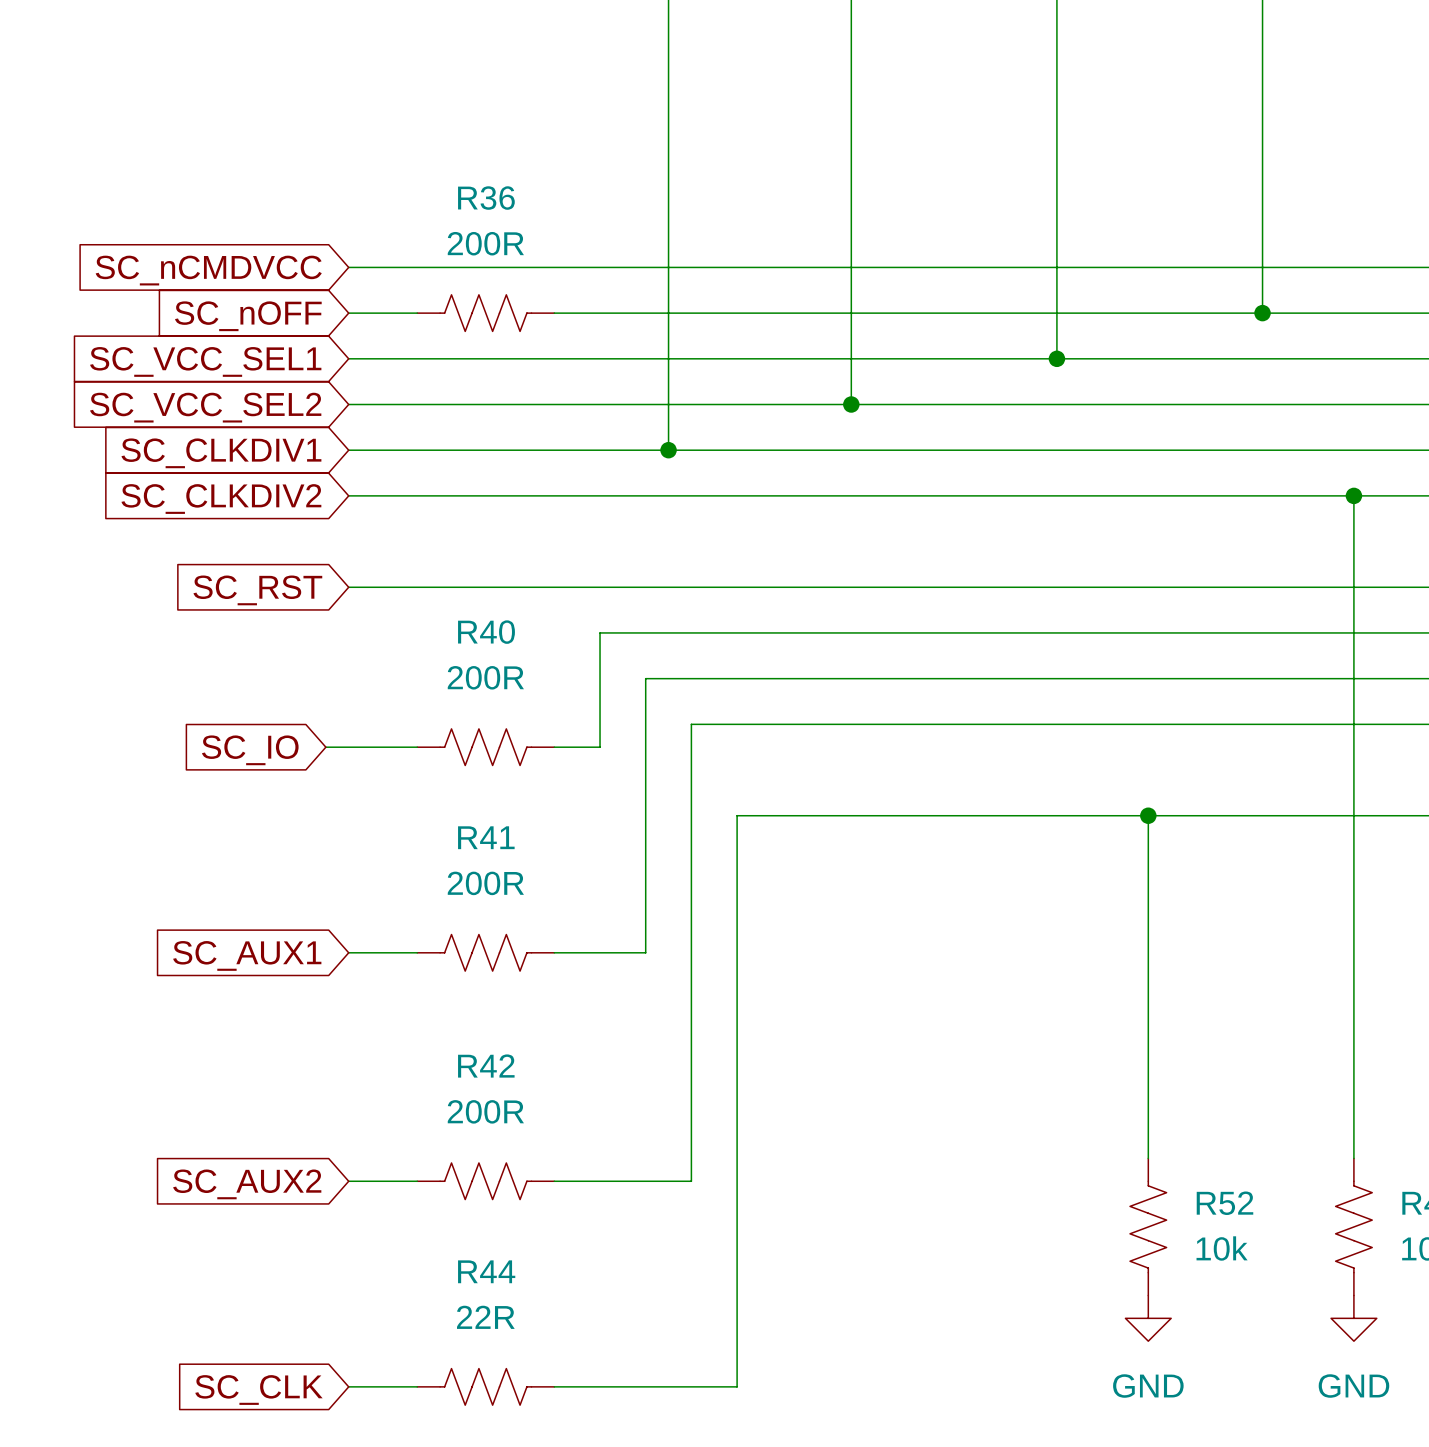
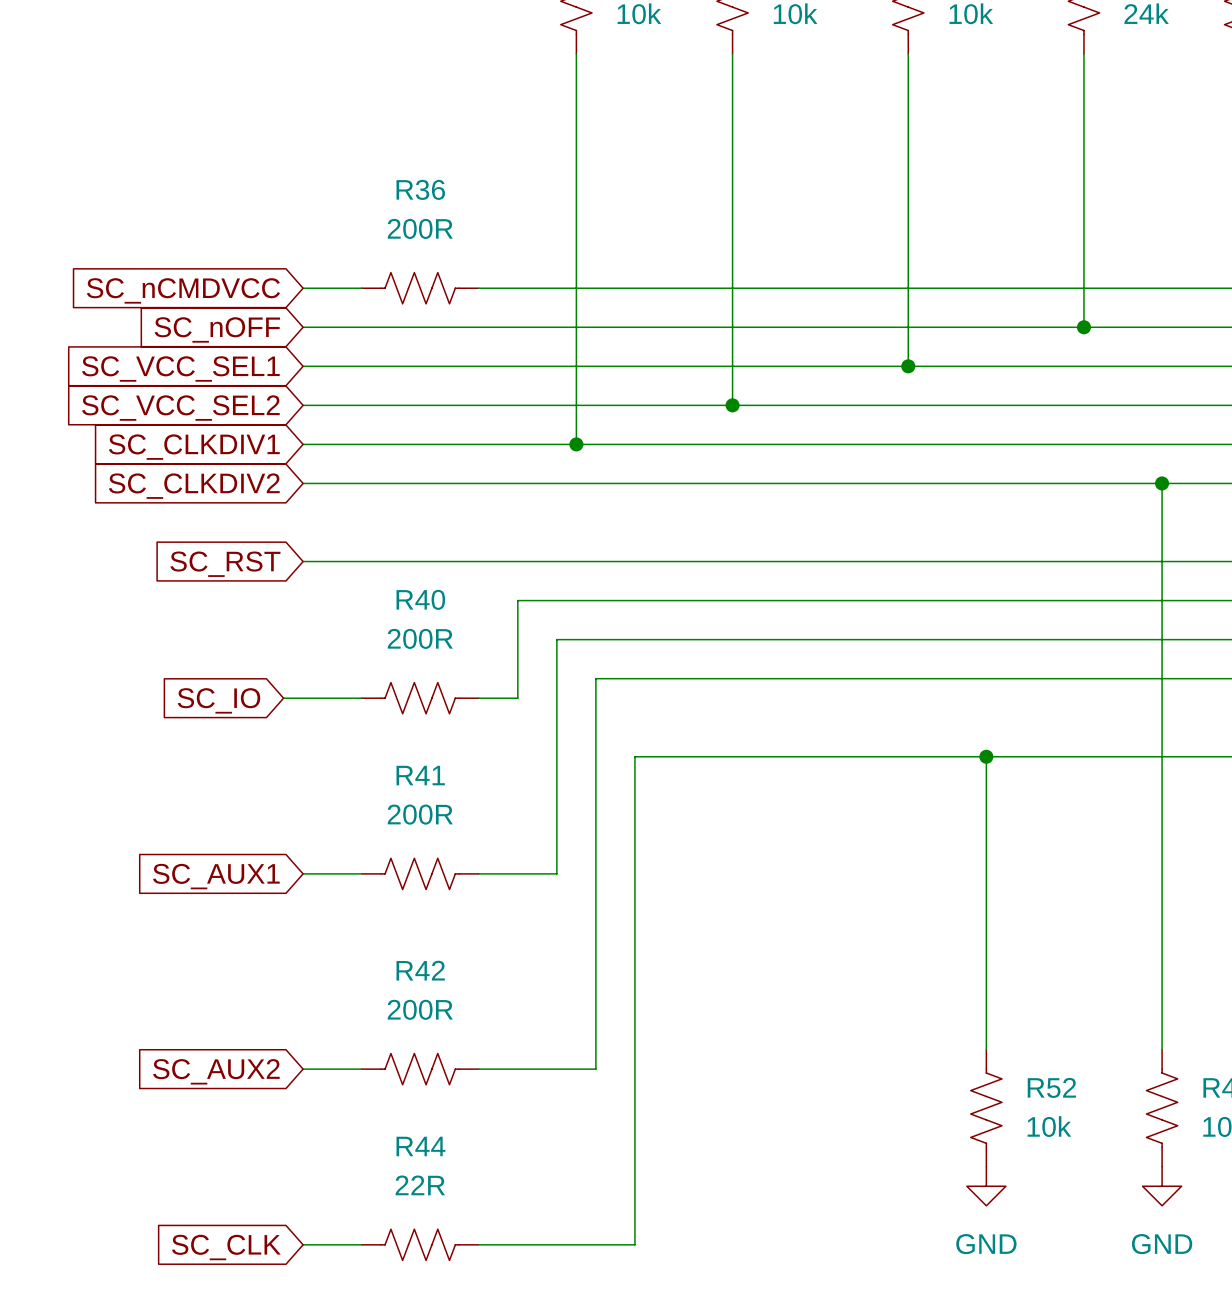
wire: (417, 267) (554, 267) -> (361, 327) (478, 327)
R36 position: (485, 313) -> (420, 288)

